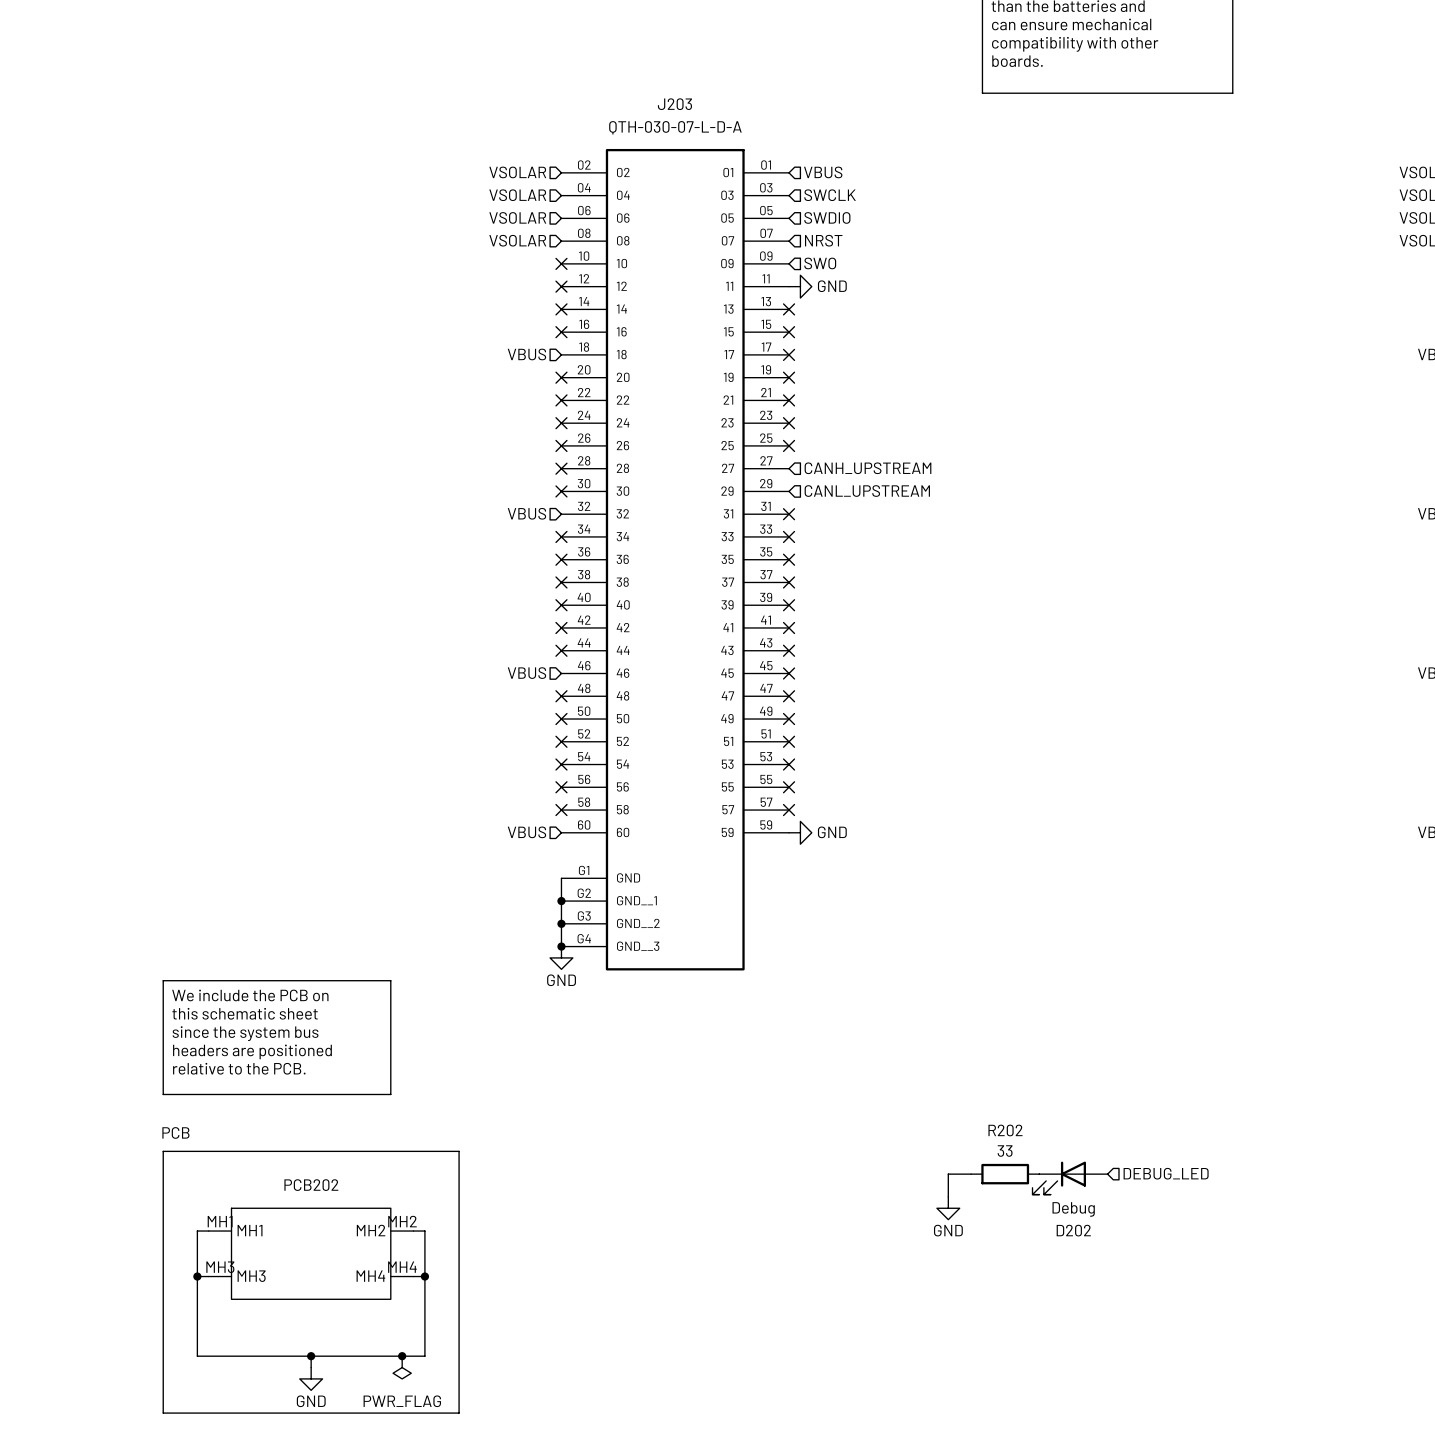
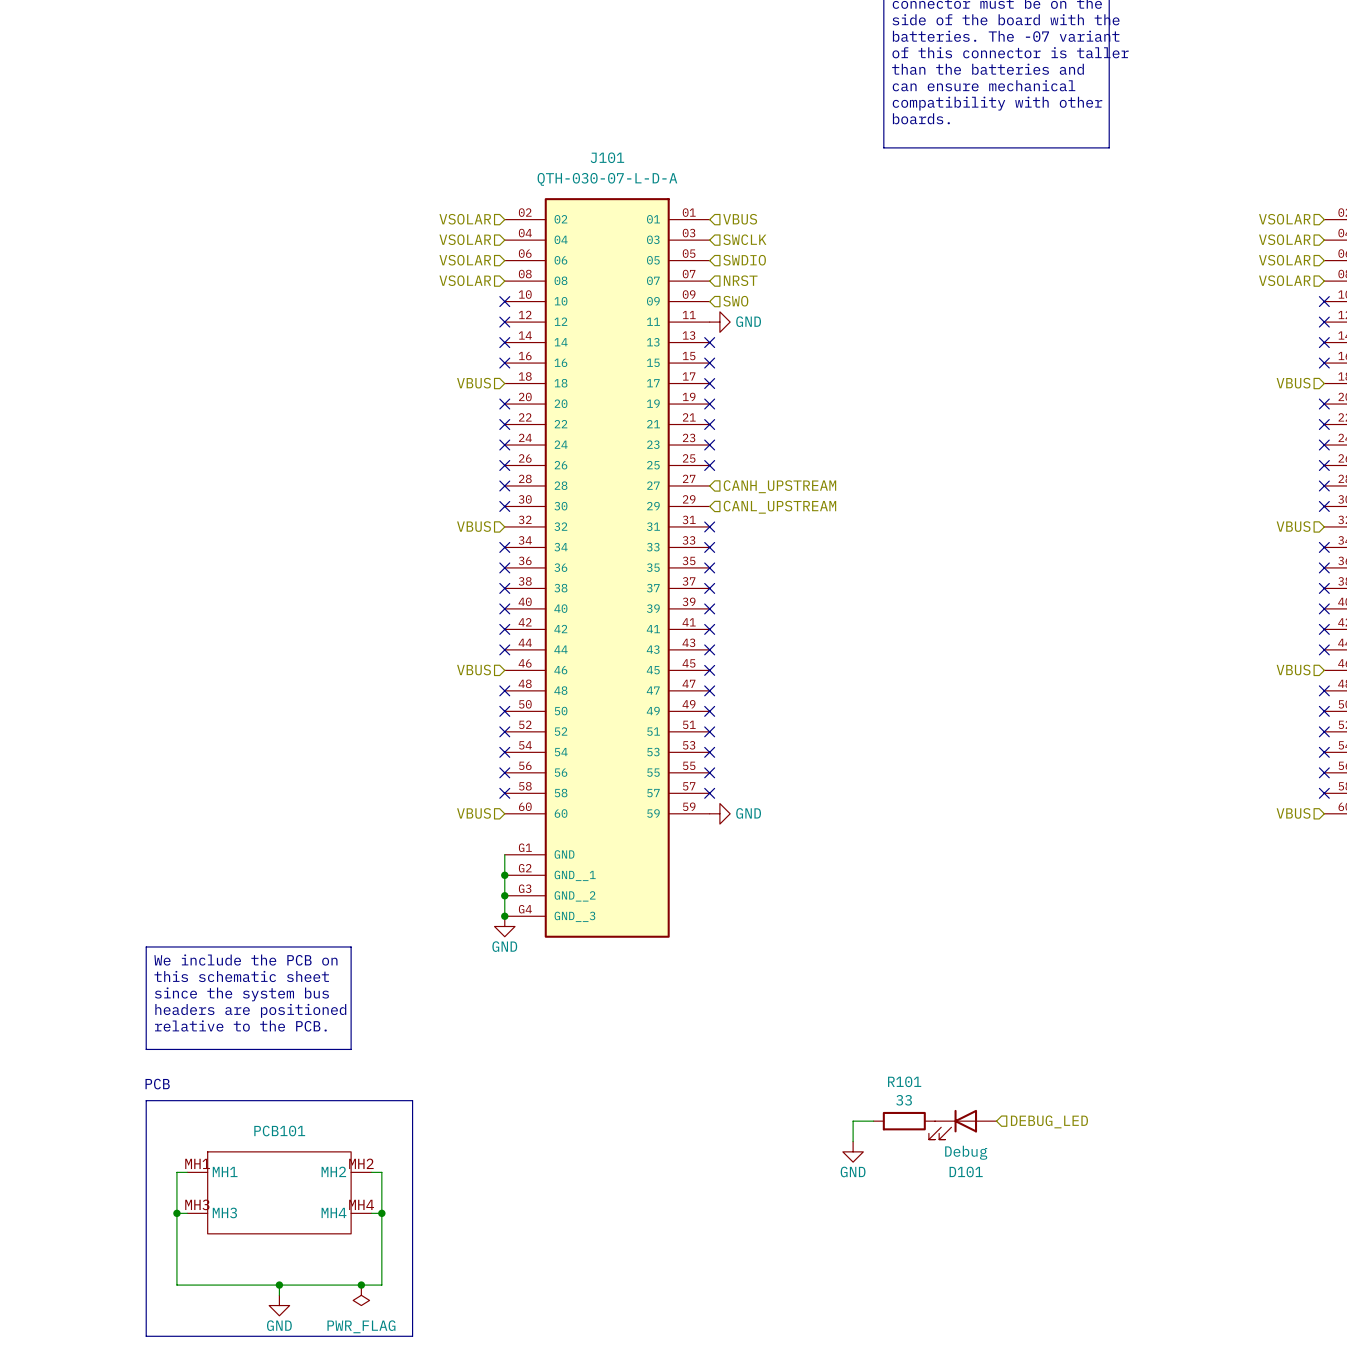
J203 name: J203 (674, 104) -> J101 (607, 157)
R202 name: R202 (1005, 1130) -> R101 (904, 1081)
PCB202 name: PCB202 (311, 1185) -> PCB101 (279, 1131)
D202 name: D202 (1073, 1230) -> D101 (966, 1171)

